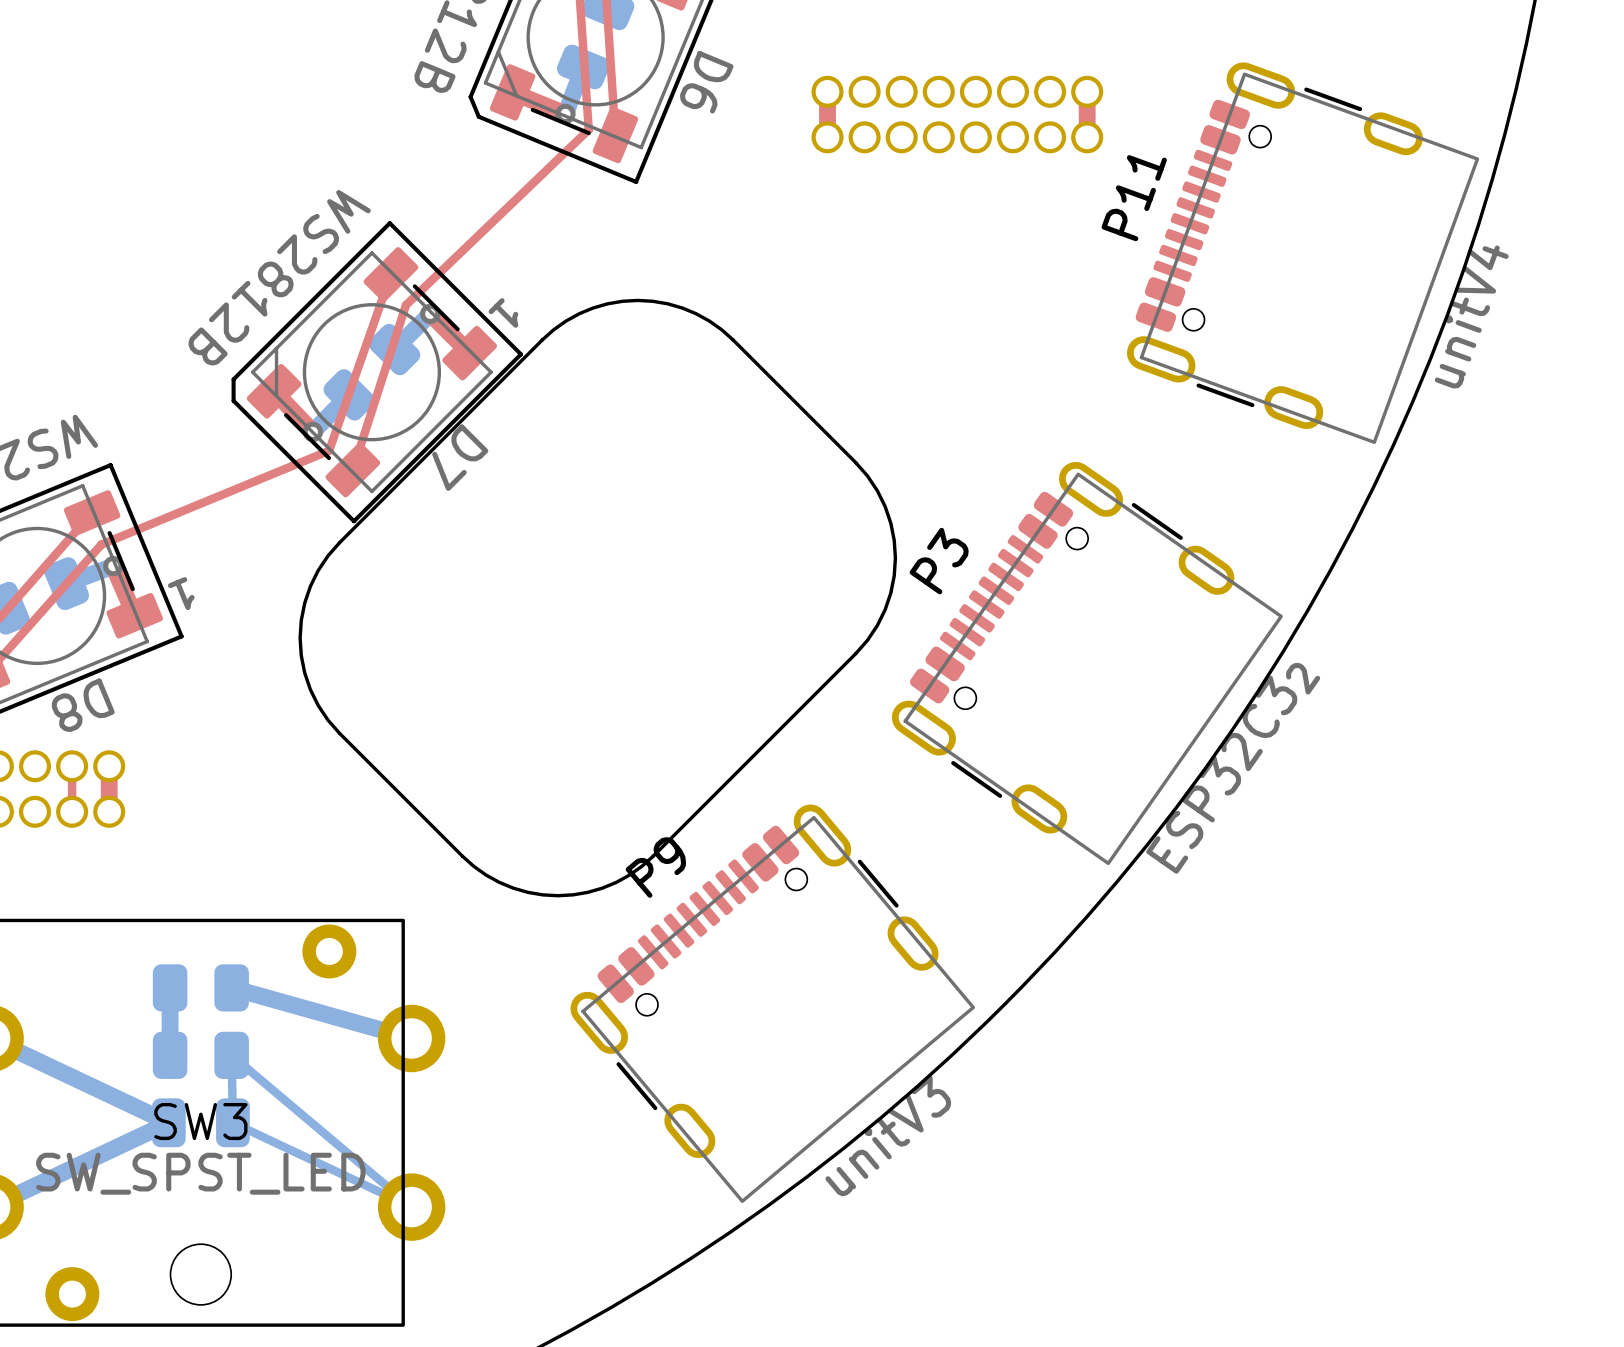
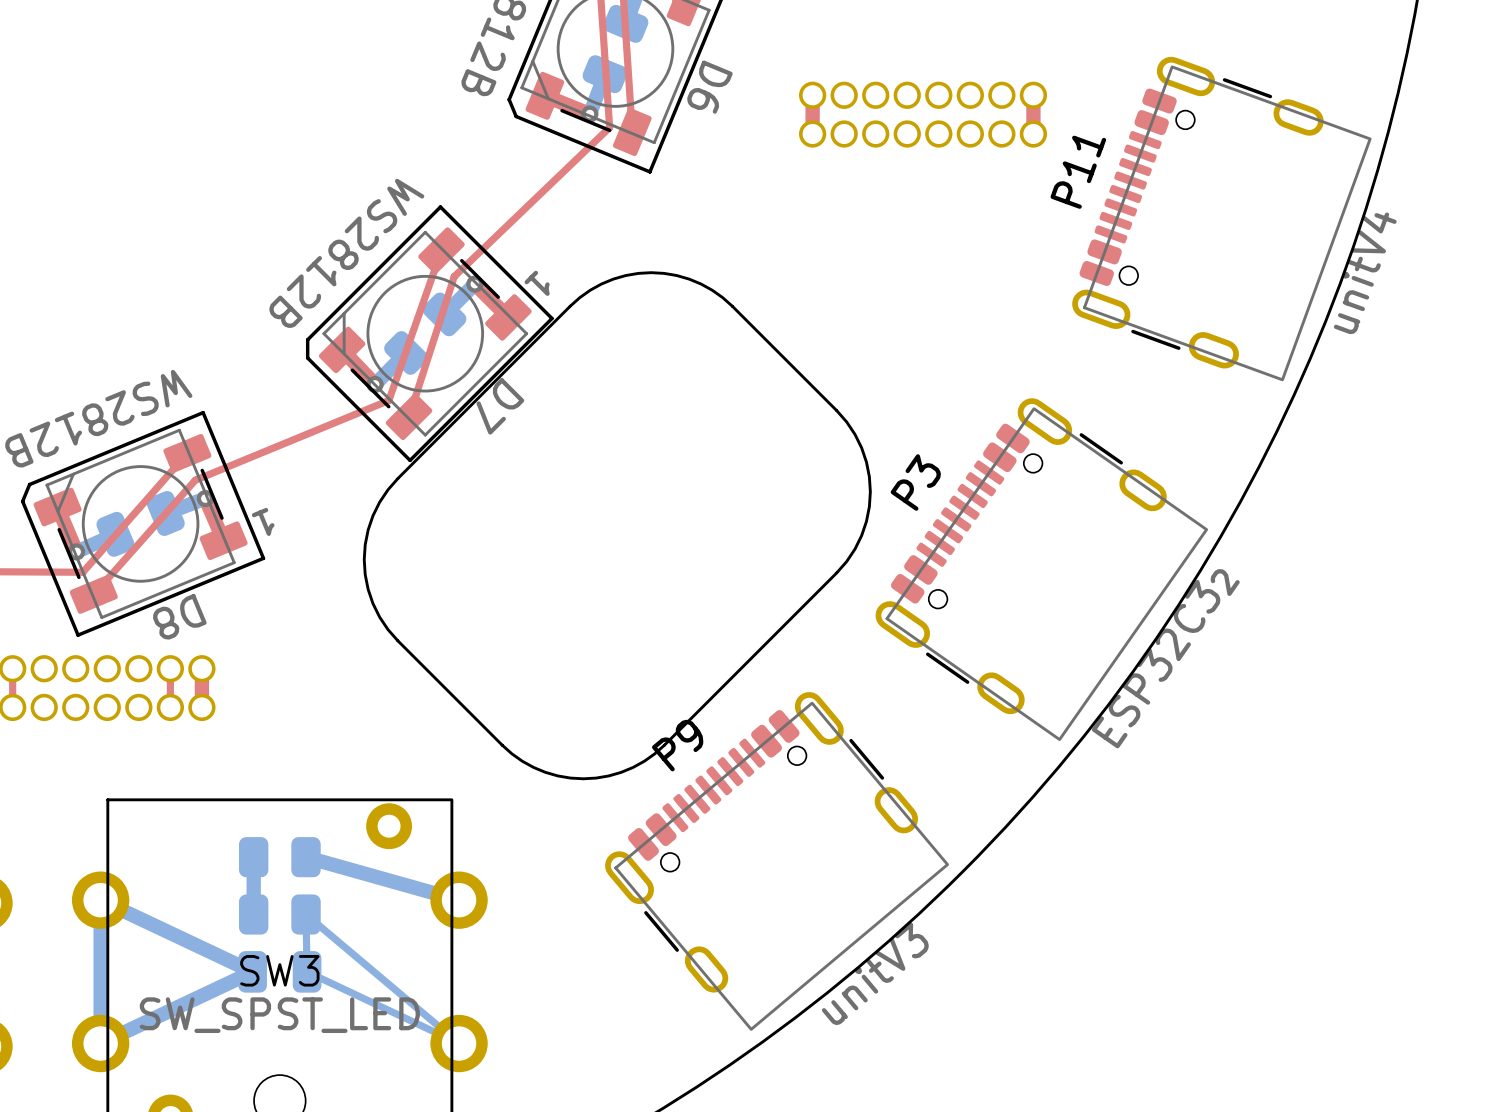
P11 position: (1303, 253) -> (1221, 219)
P3 position: (1087, 663) -> (1041, 569)
P9 position: (772, 1003) -> (777, 861)

